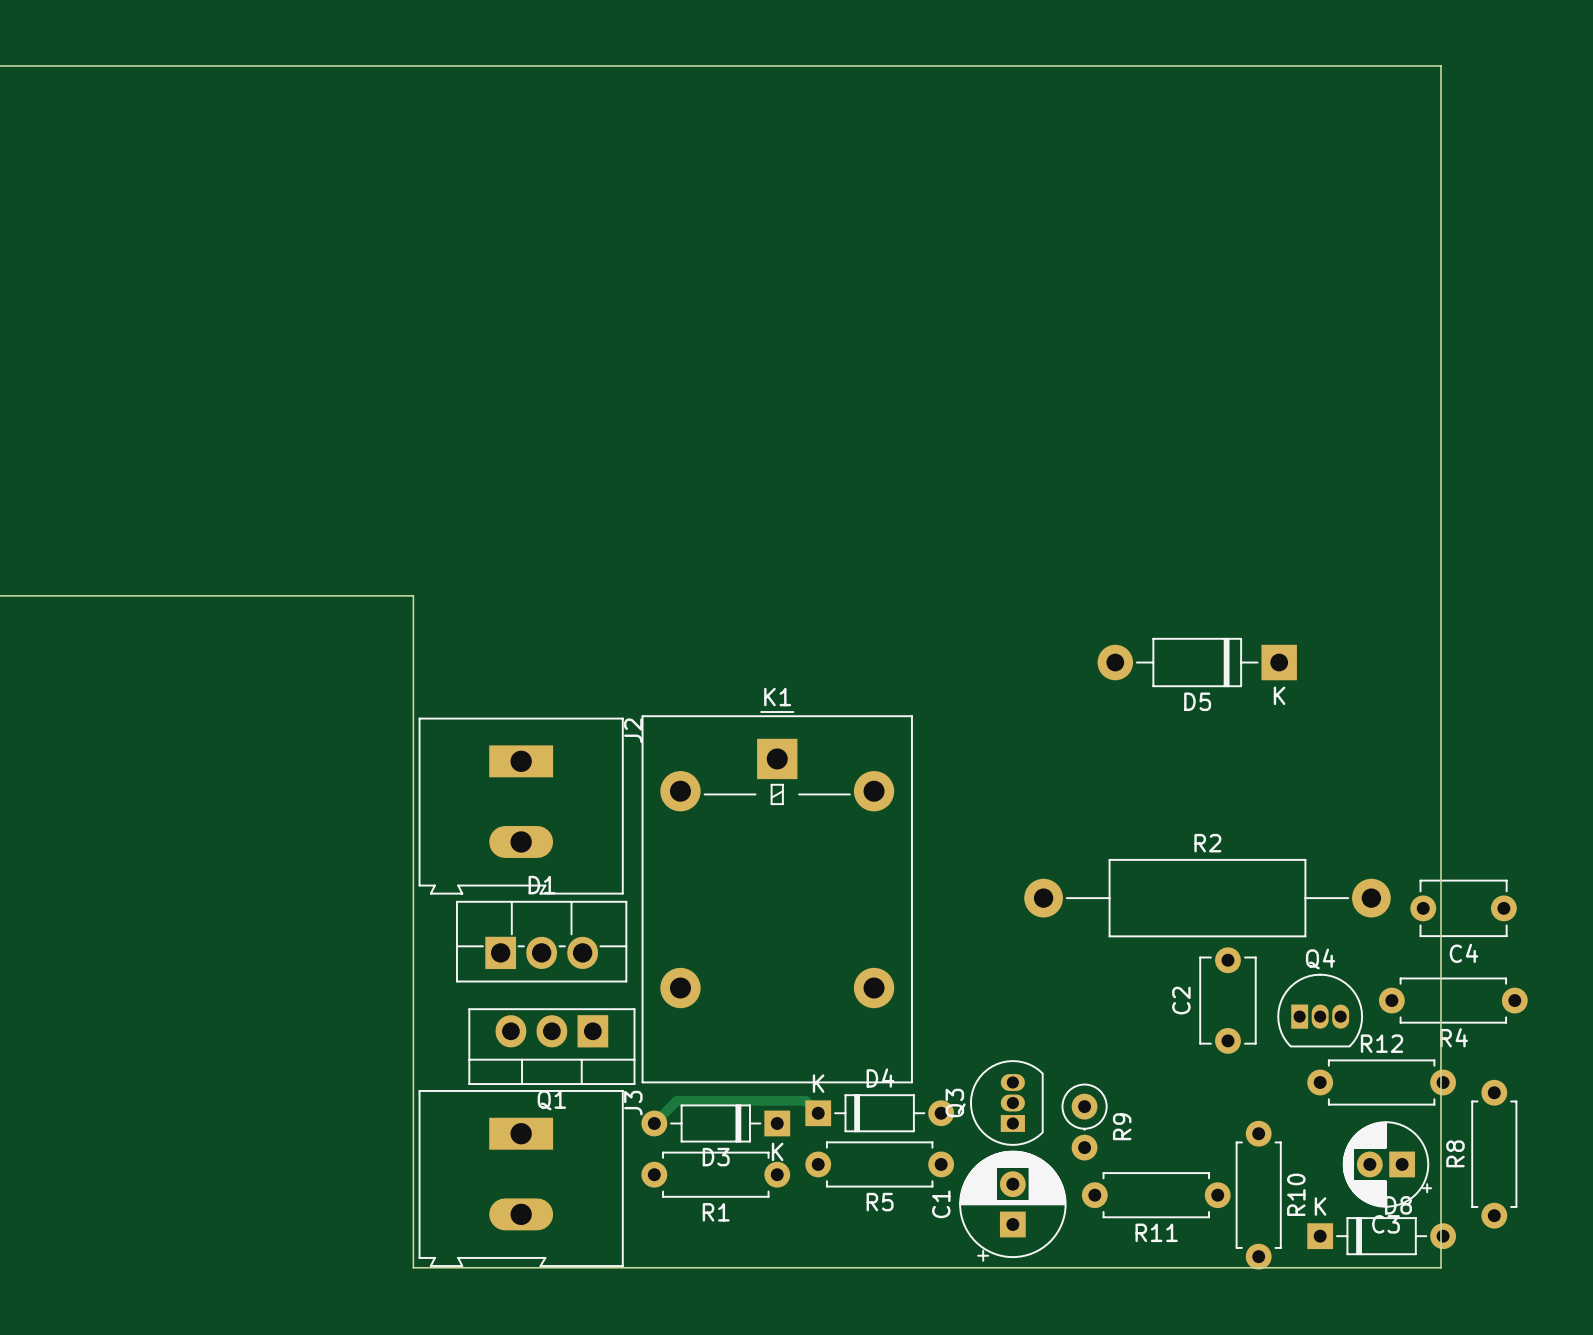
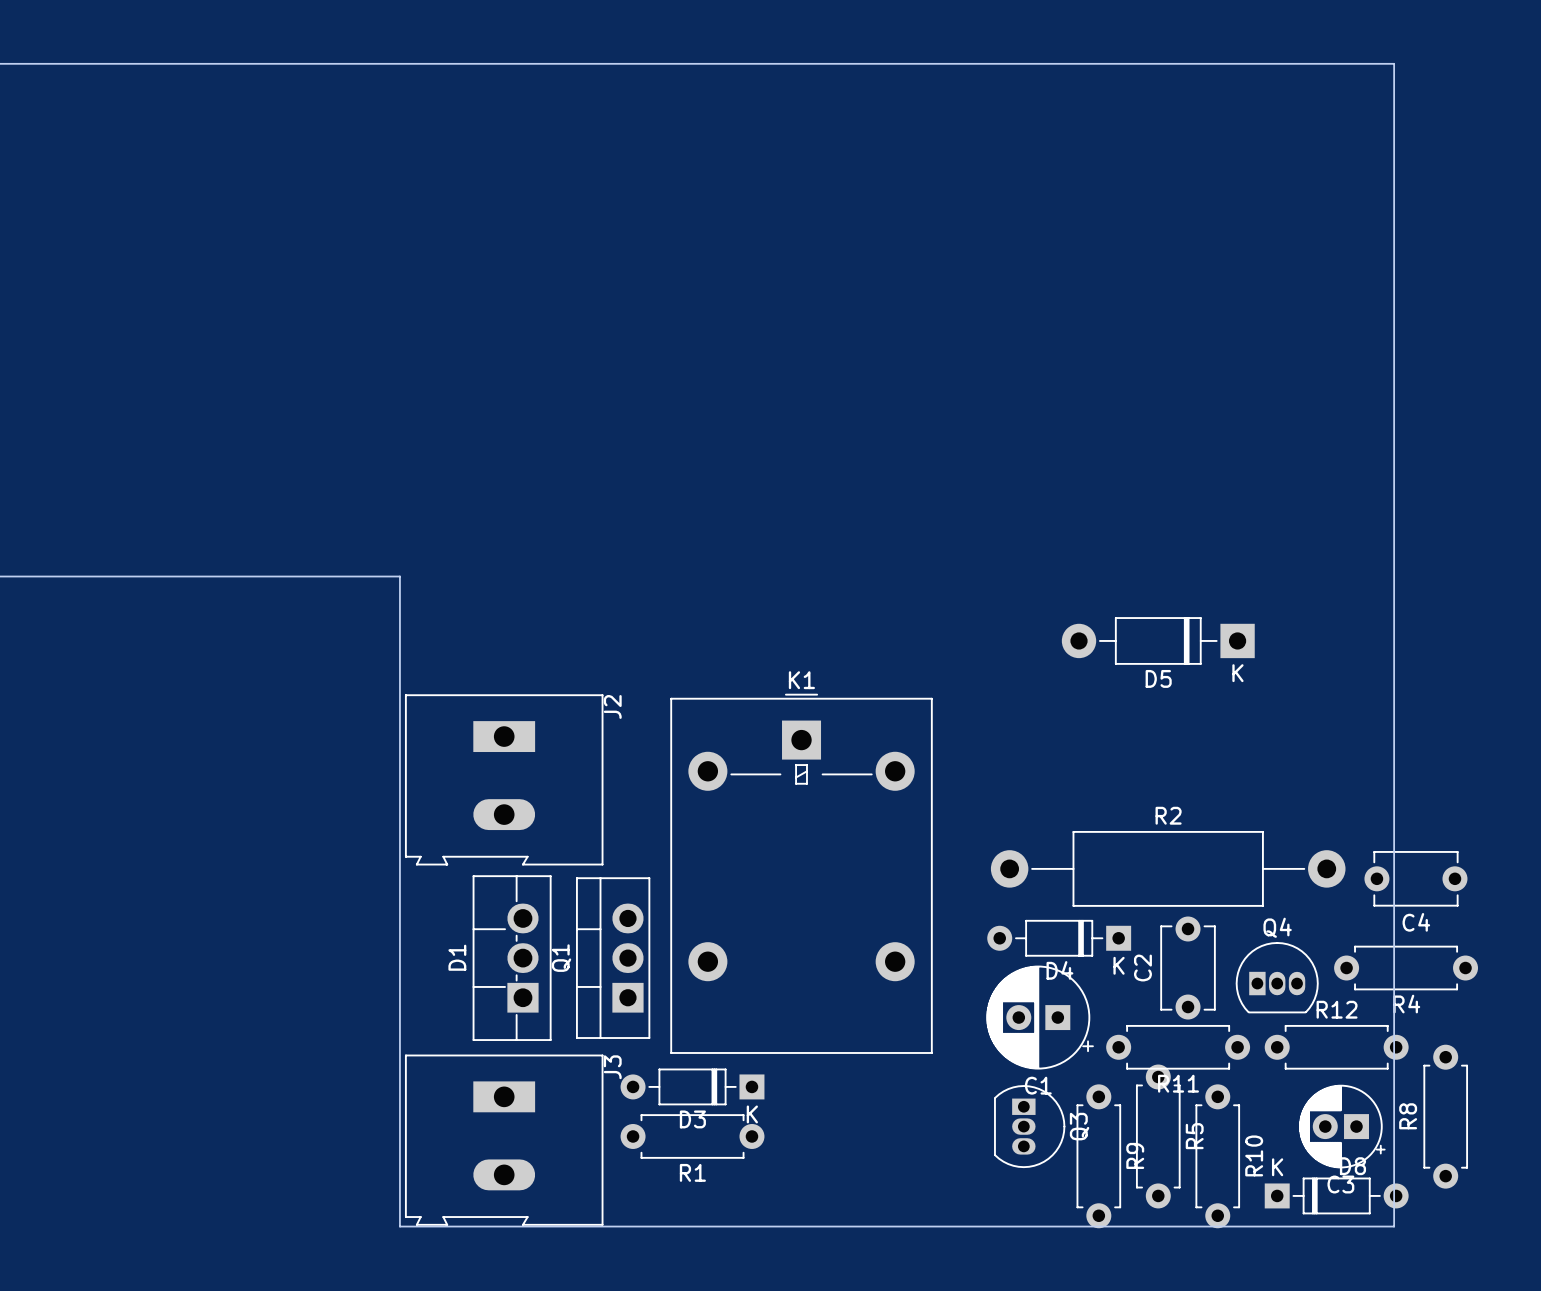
K1 position: (777, 897) -> (801, 873)
D1 rotation: 0° (541, 941) -> 90° counterclockwise (512, 958)
Q1 rotation: 0° (551, 1046) -> 90° clockwise (613, 958)
R9 footprint: [1061, 1083, 1108, 1161] -> [1076, 1084, 1122, 1229]
Q3 rotation: 0° (1006, 1103) -> 180° (1029, 1126)
Q3 position: (1006, 1103) -> (1029, 1126)
track: (818, 1113) (805, 1100) (676, 1100) (654, 1123) -> none
D4 rotation: 0° (879, 1113) -> 180° (1059, 938)
D4 position: (879, 1113) -> (1059, 938)
R5 rotation: 0° (879, 1164) -> 90° clockwise (1158, 1136)
R5 position: (879, 1164) -> (1158, 1136)
R11 position: (1156, 1195) -> (1178, 1047)
R5 name position: R5 (880, 1202) -> R5 (1194, 1136)
C1 rotation: 0° (1012, 1206) -> 90° counterclockwise (1040, 1017)
C1 position: (1012, 1206) -> (1040, 1017)

